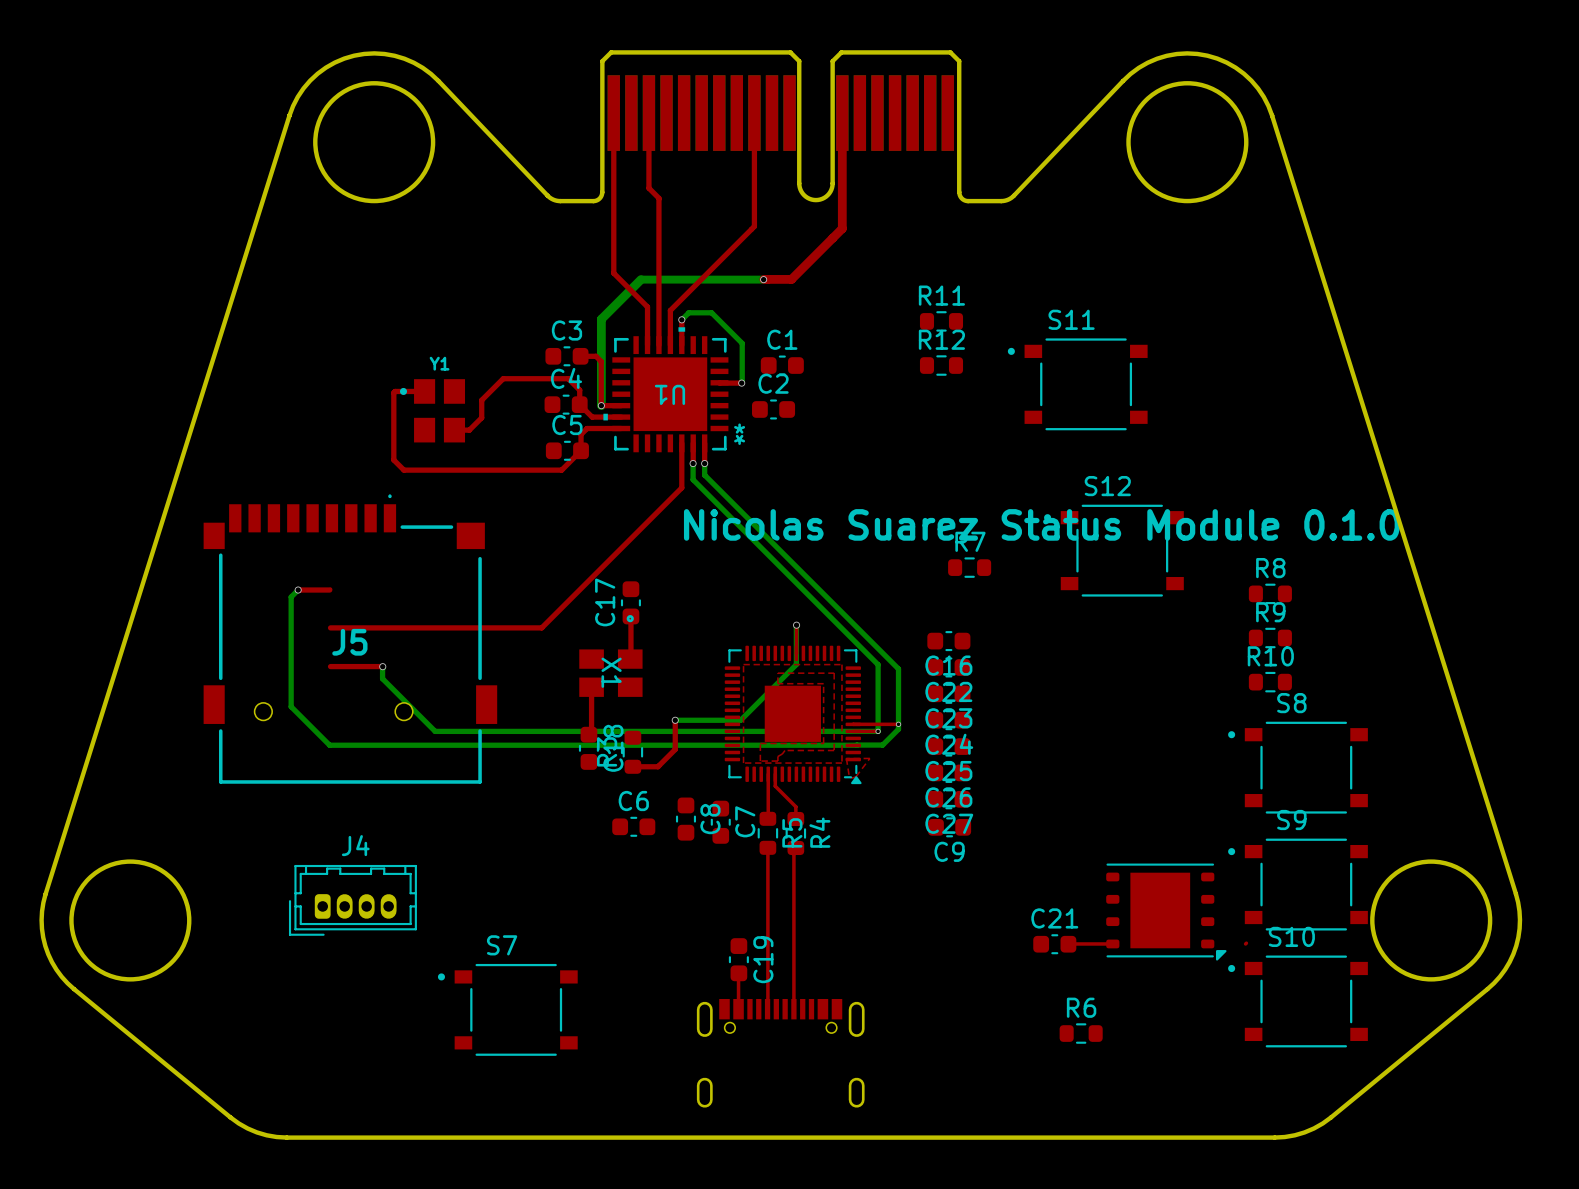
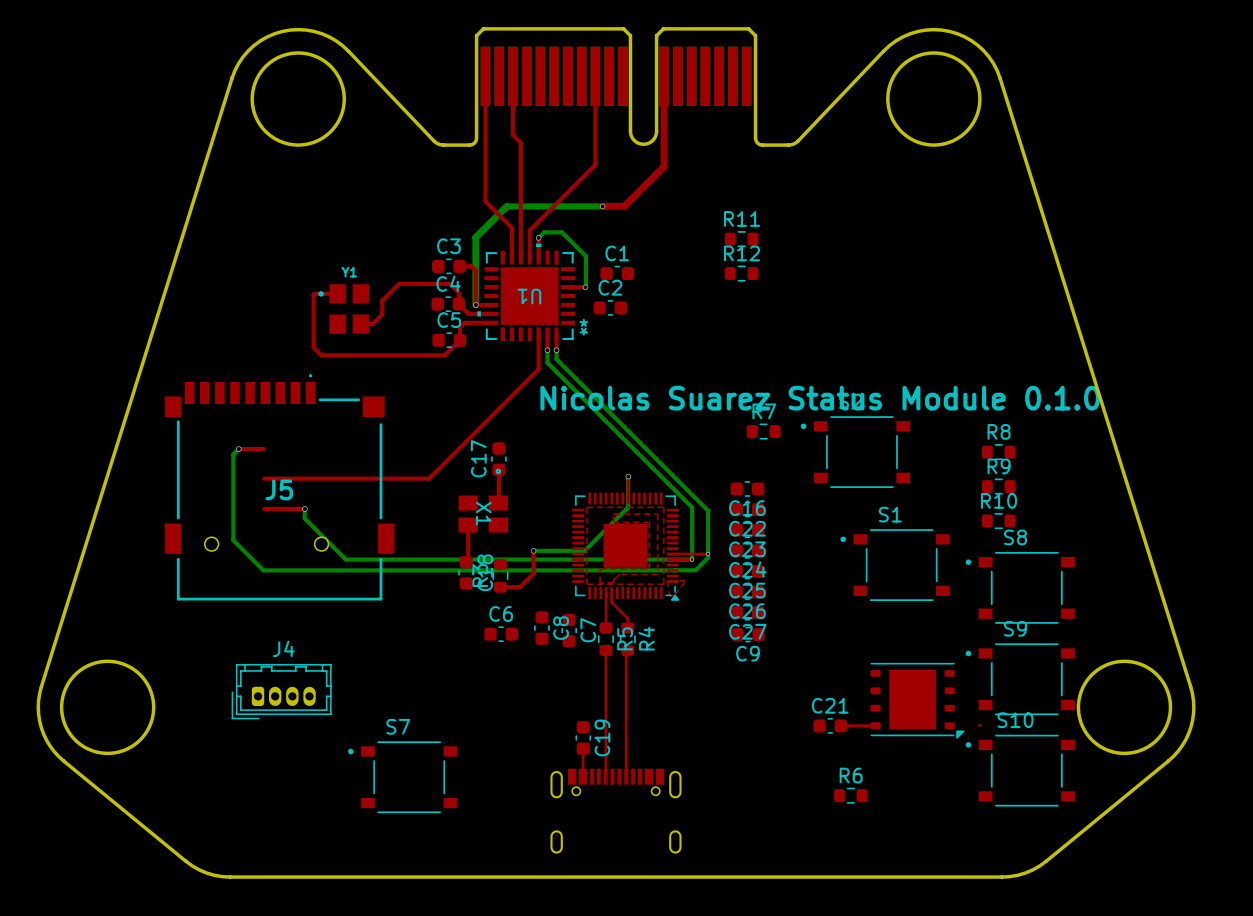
S11: (1077, 384) -> none
S12: (1113, 550) -> none
part: none -> (855, 452)
S1: none -> (895, 565)

